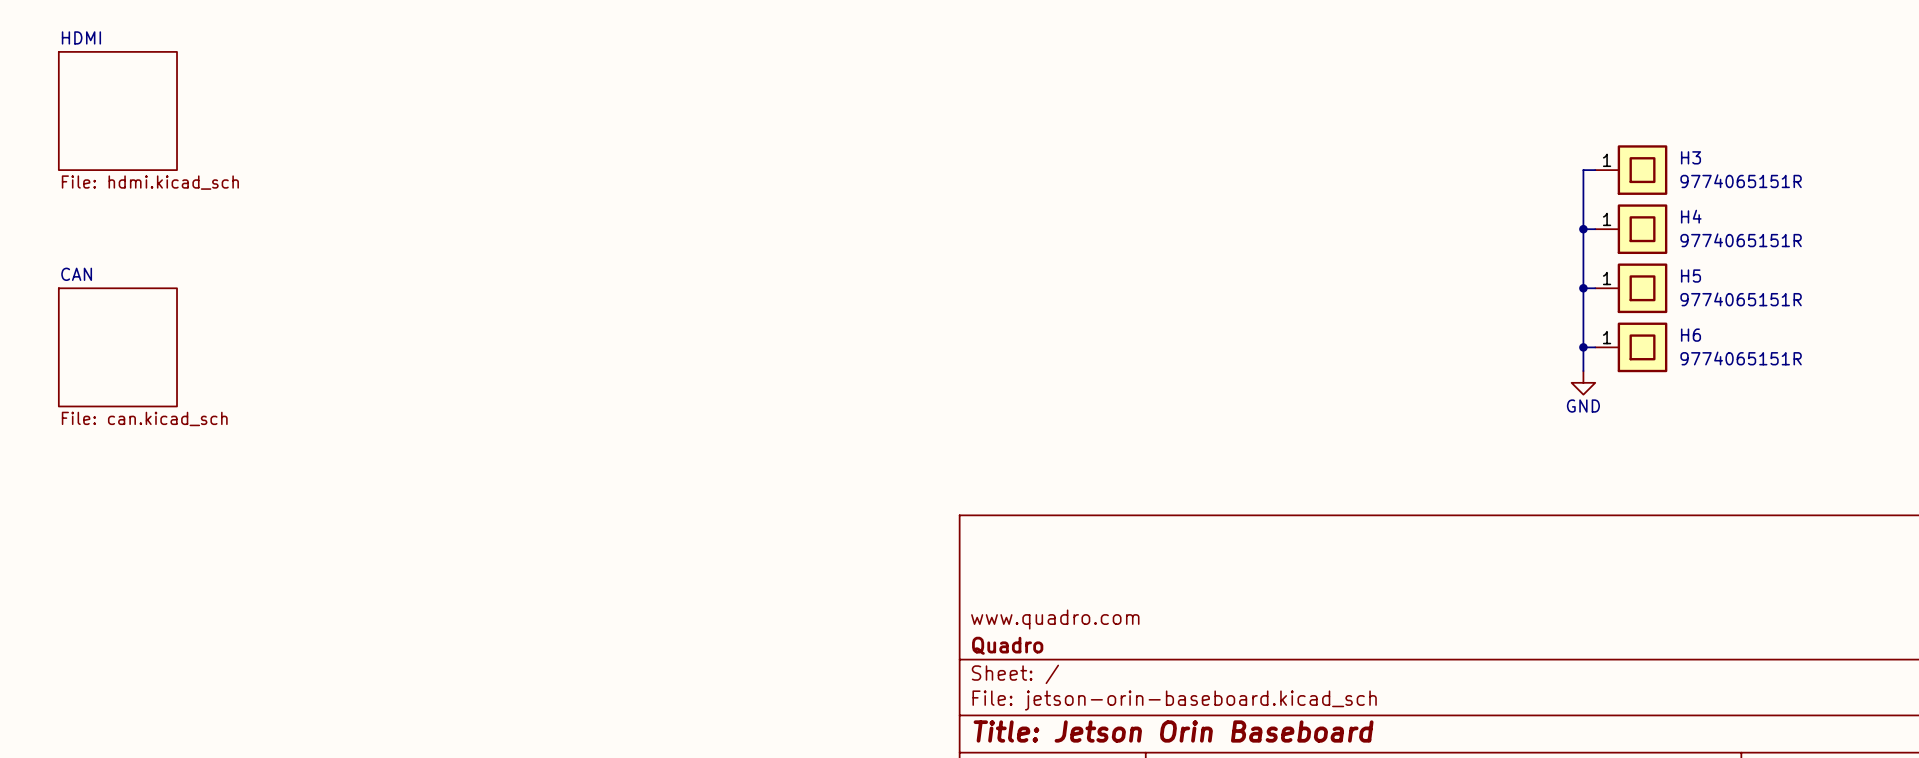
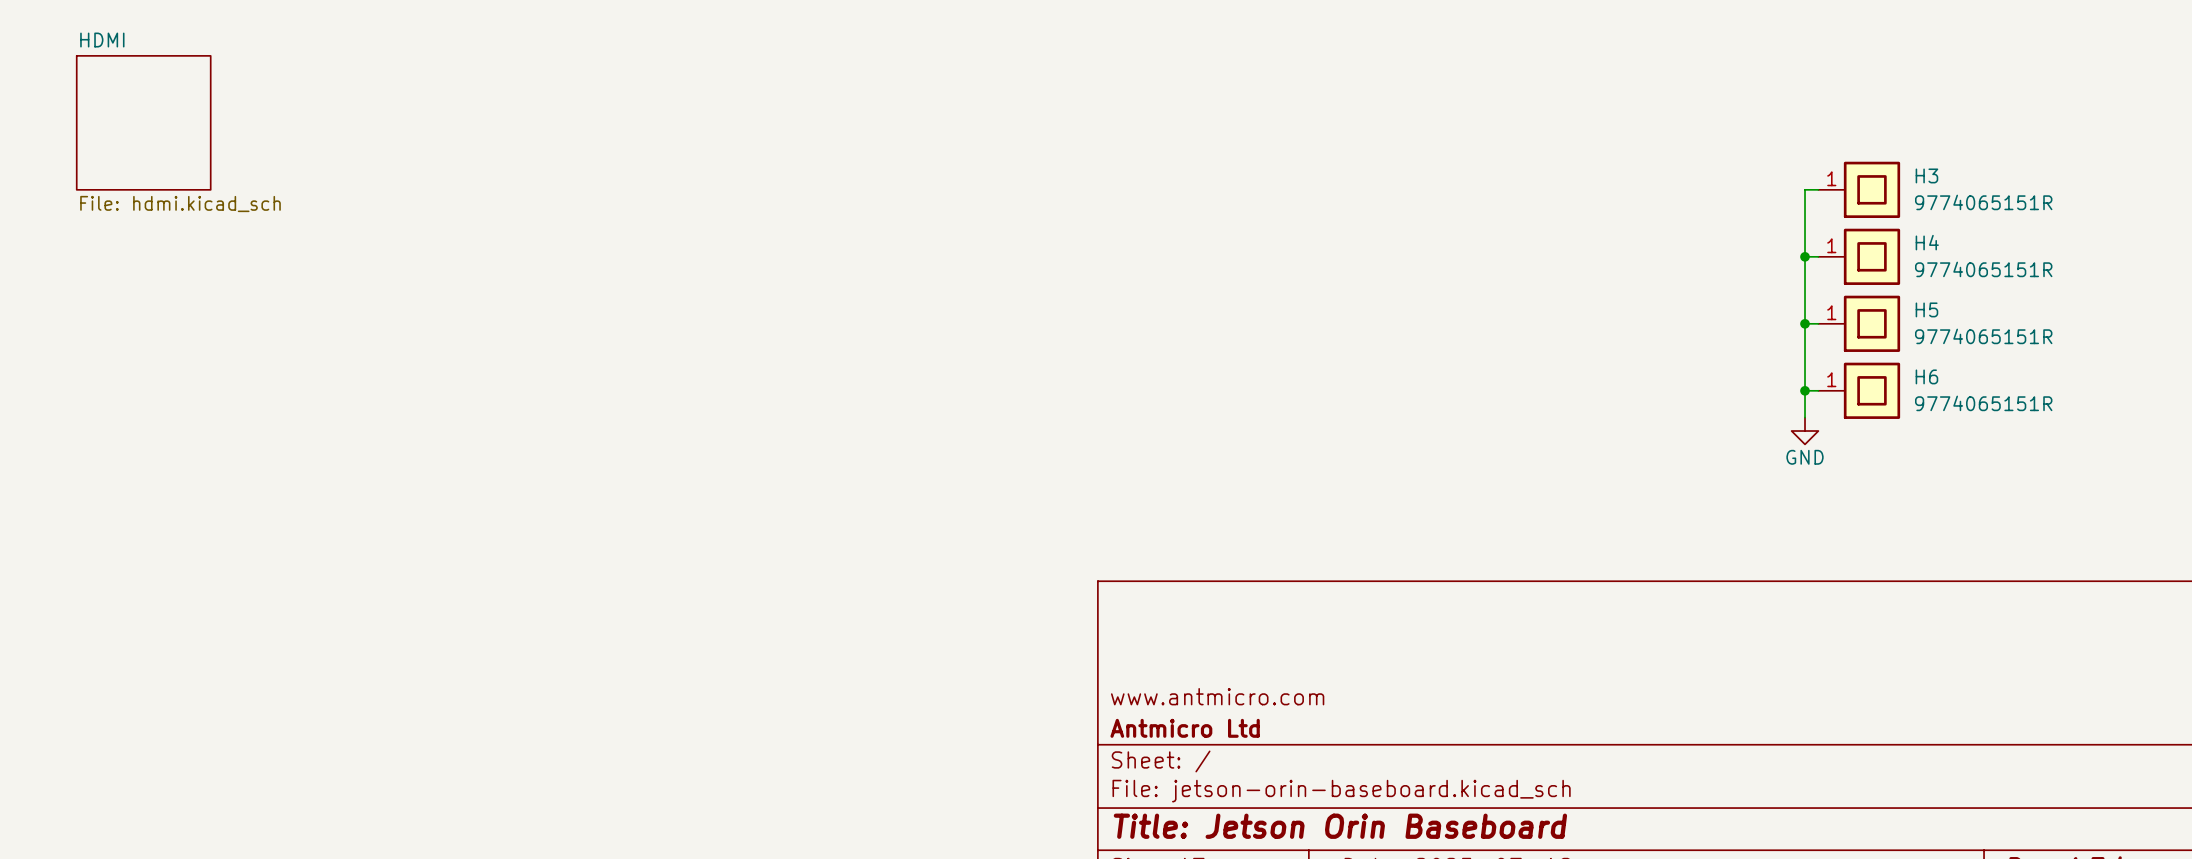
sheet CAN: File: can.kicad_sch (117, 347) -> none
title block: www.quadro.com (1055, 619) -> www.antmicro.com (1217, 696)
title block: Quadro (1007, 645) -> Antmicro Ltd (1185, 728)

